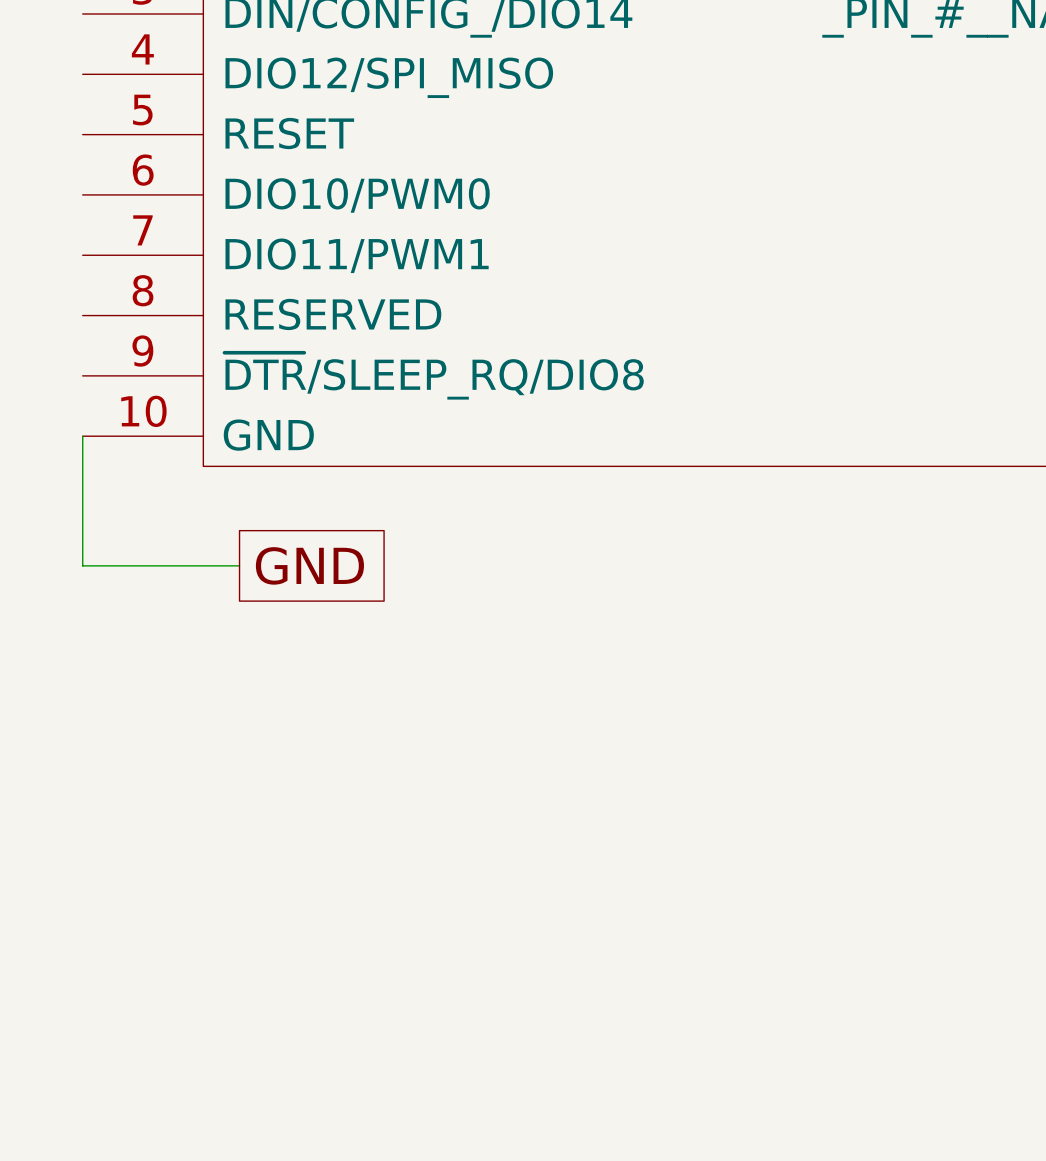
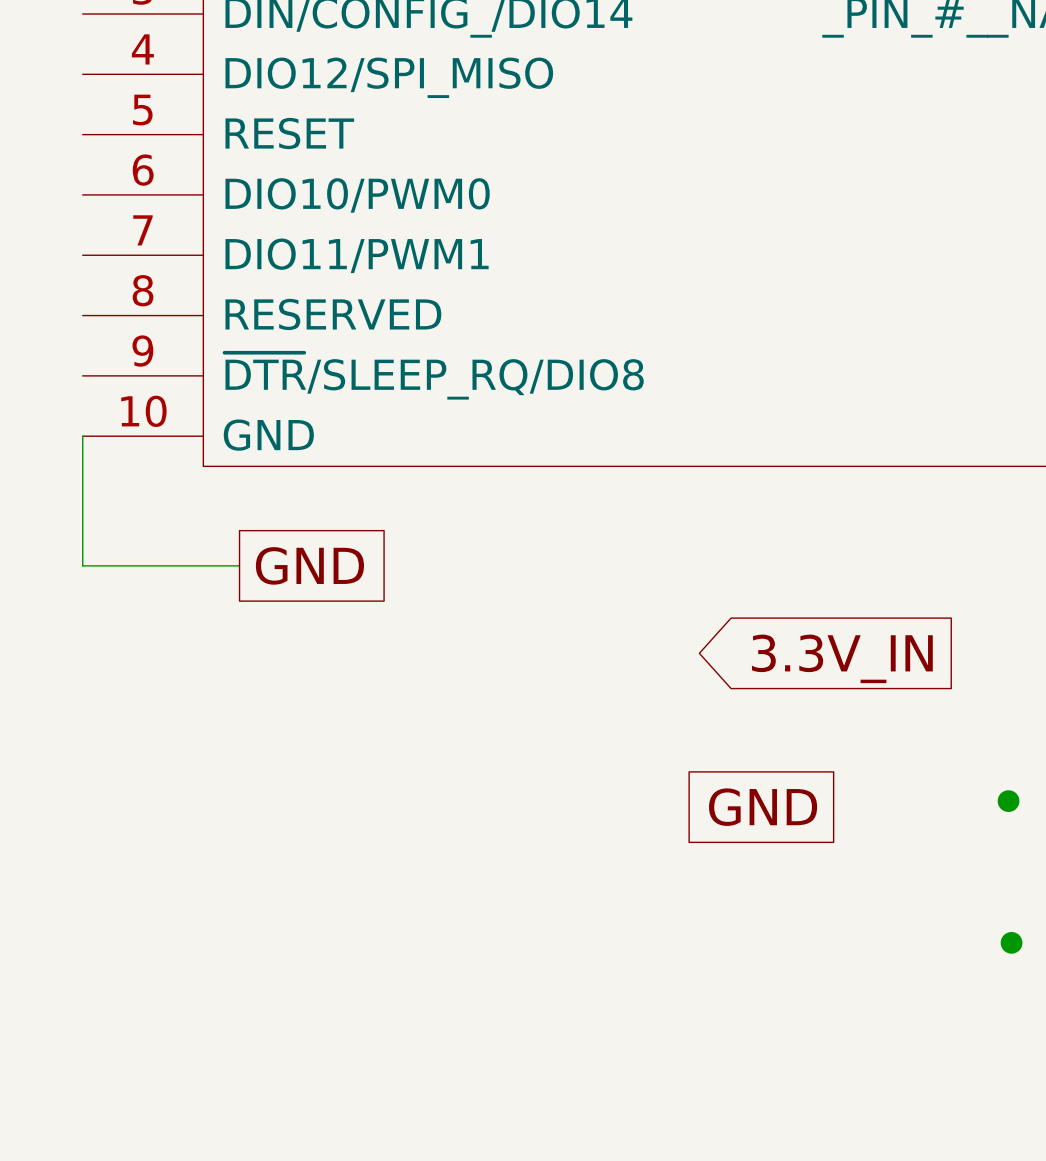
global label: none -> 3.3V_IN (842, 658)
junction: none -> (1008, 801)
global label: none -> GND (763, 807)
junction: none -> (1011, 942)

